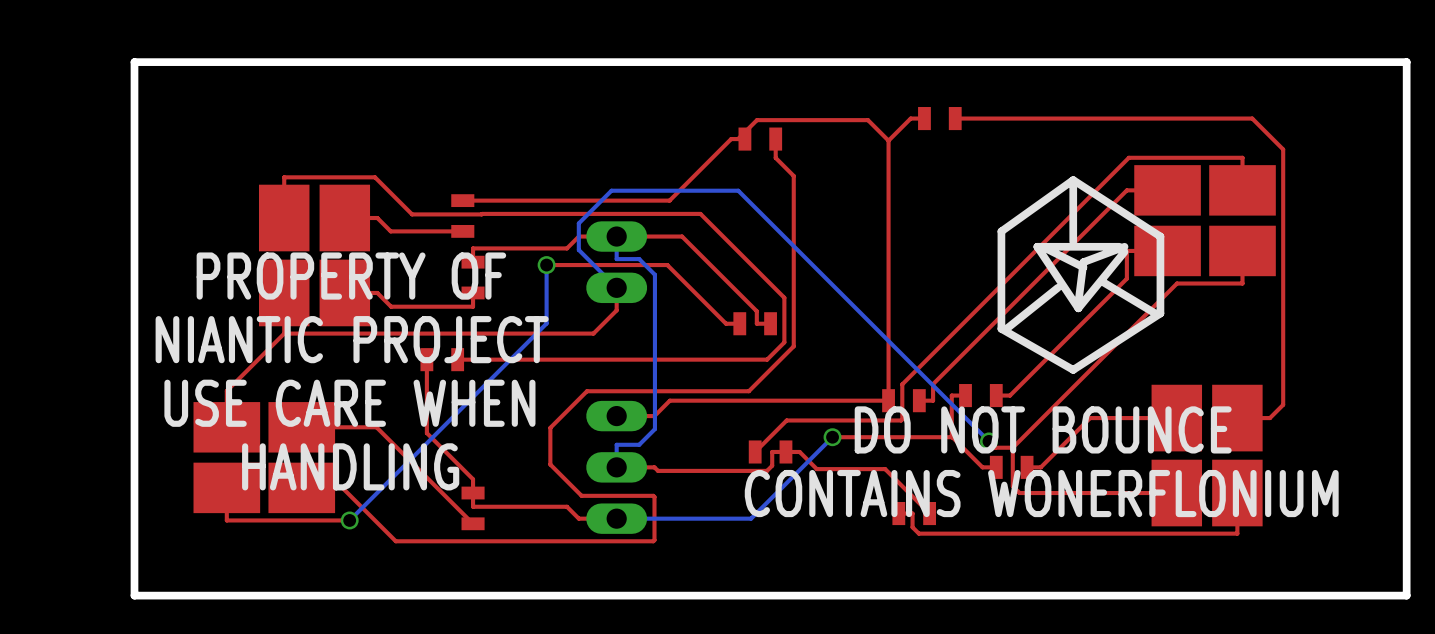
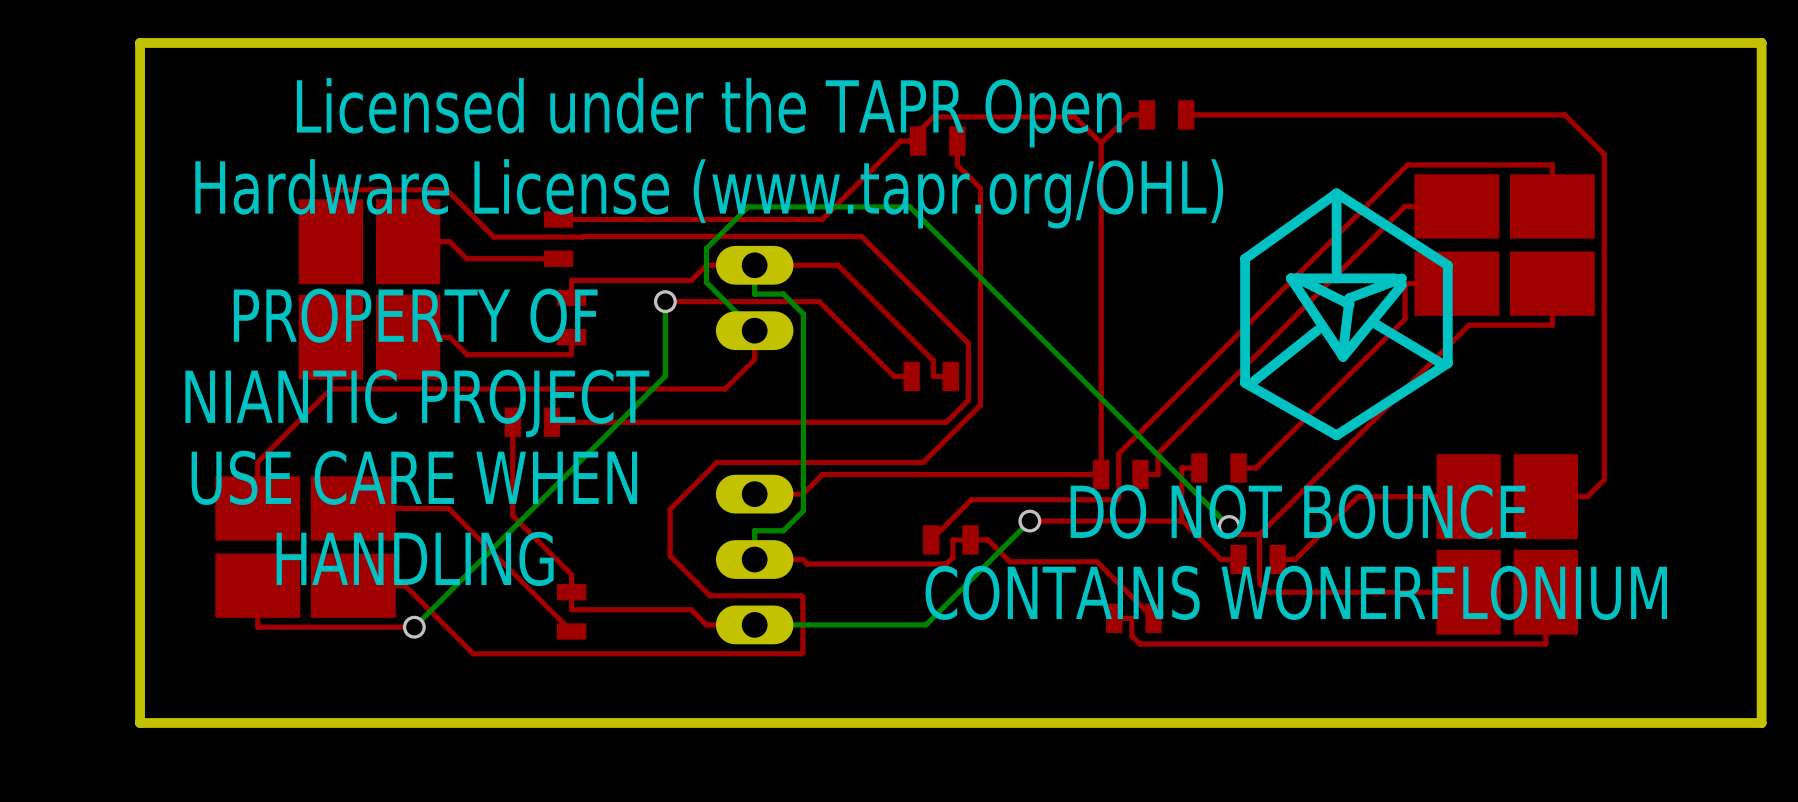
text: none -> Licensed under the TAPR Open (709, 112)
text: none -> Hardware License (www.tapr.org/OHL) (709, 193)

